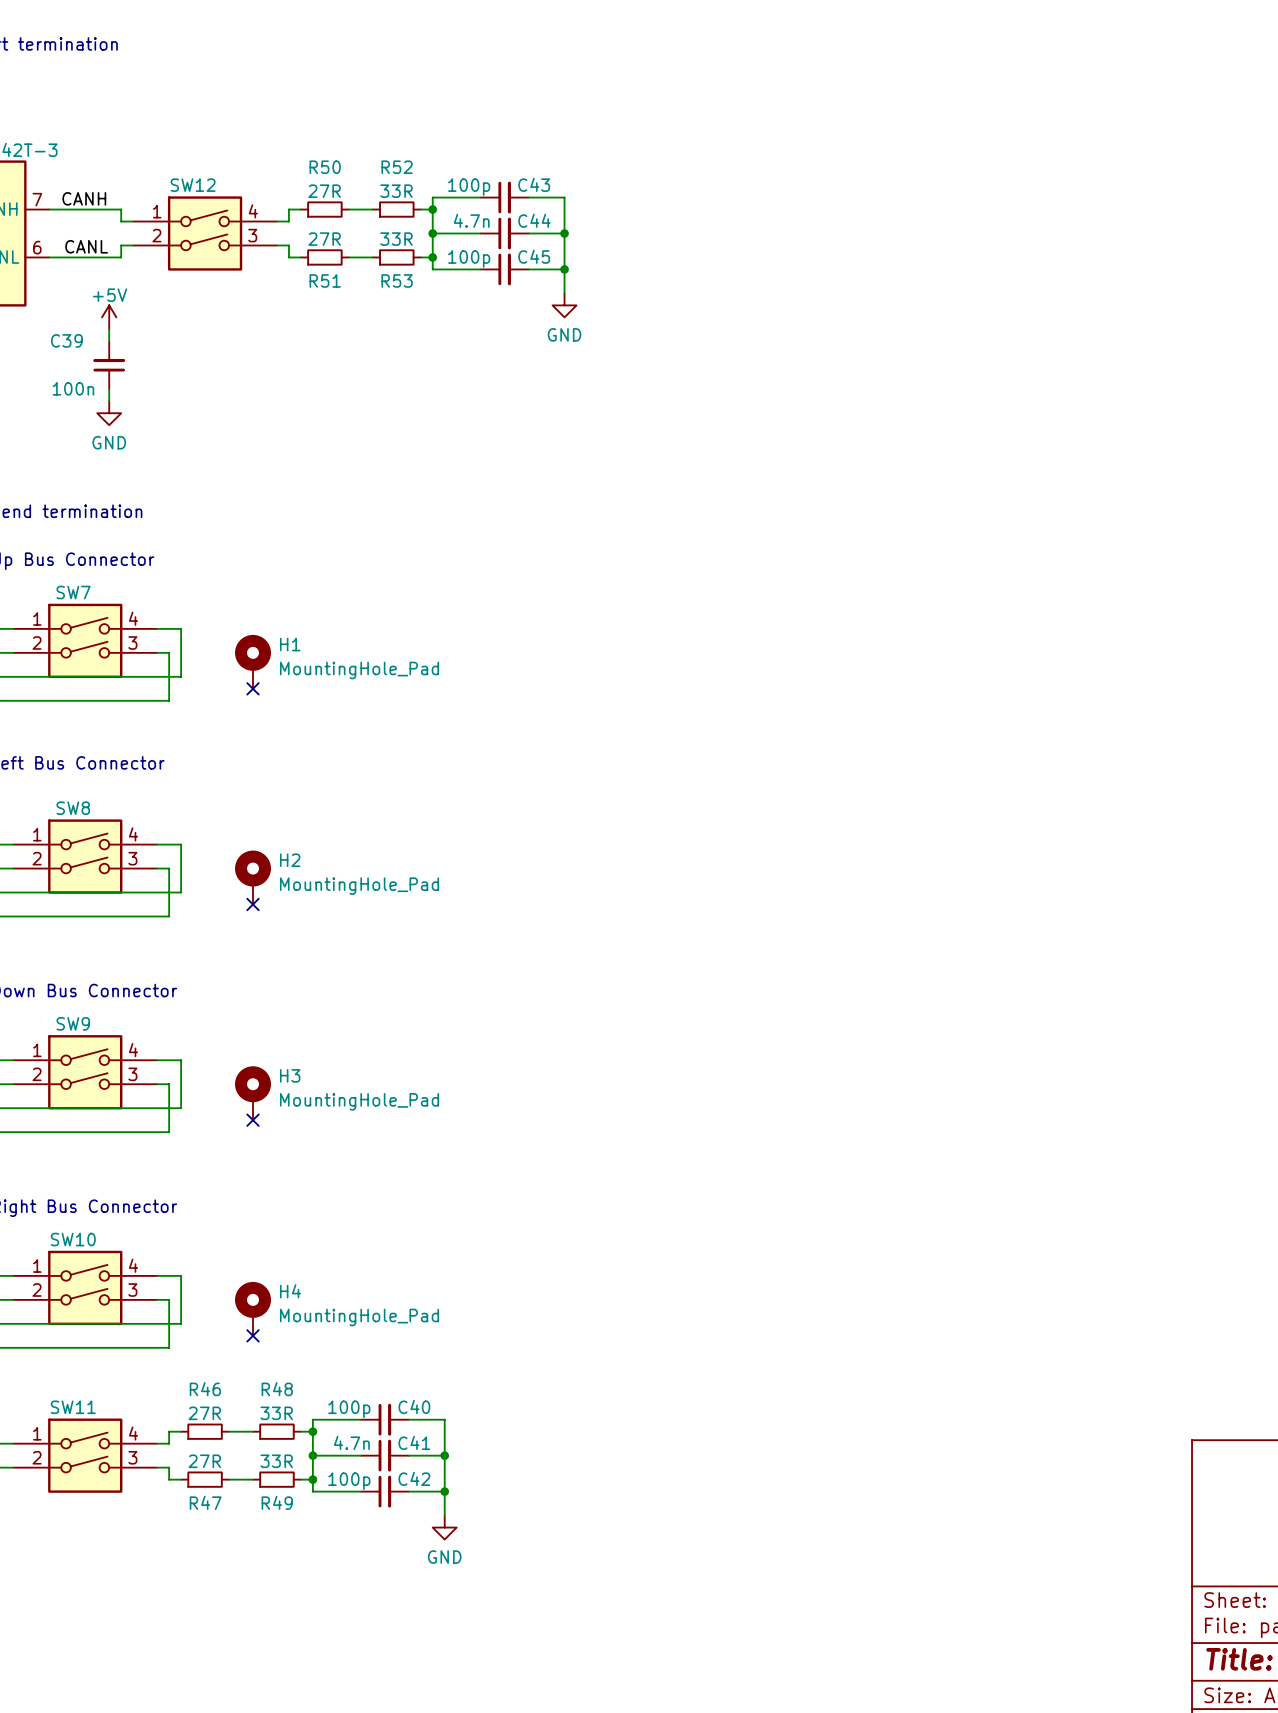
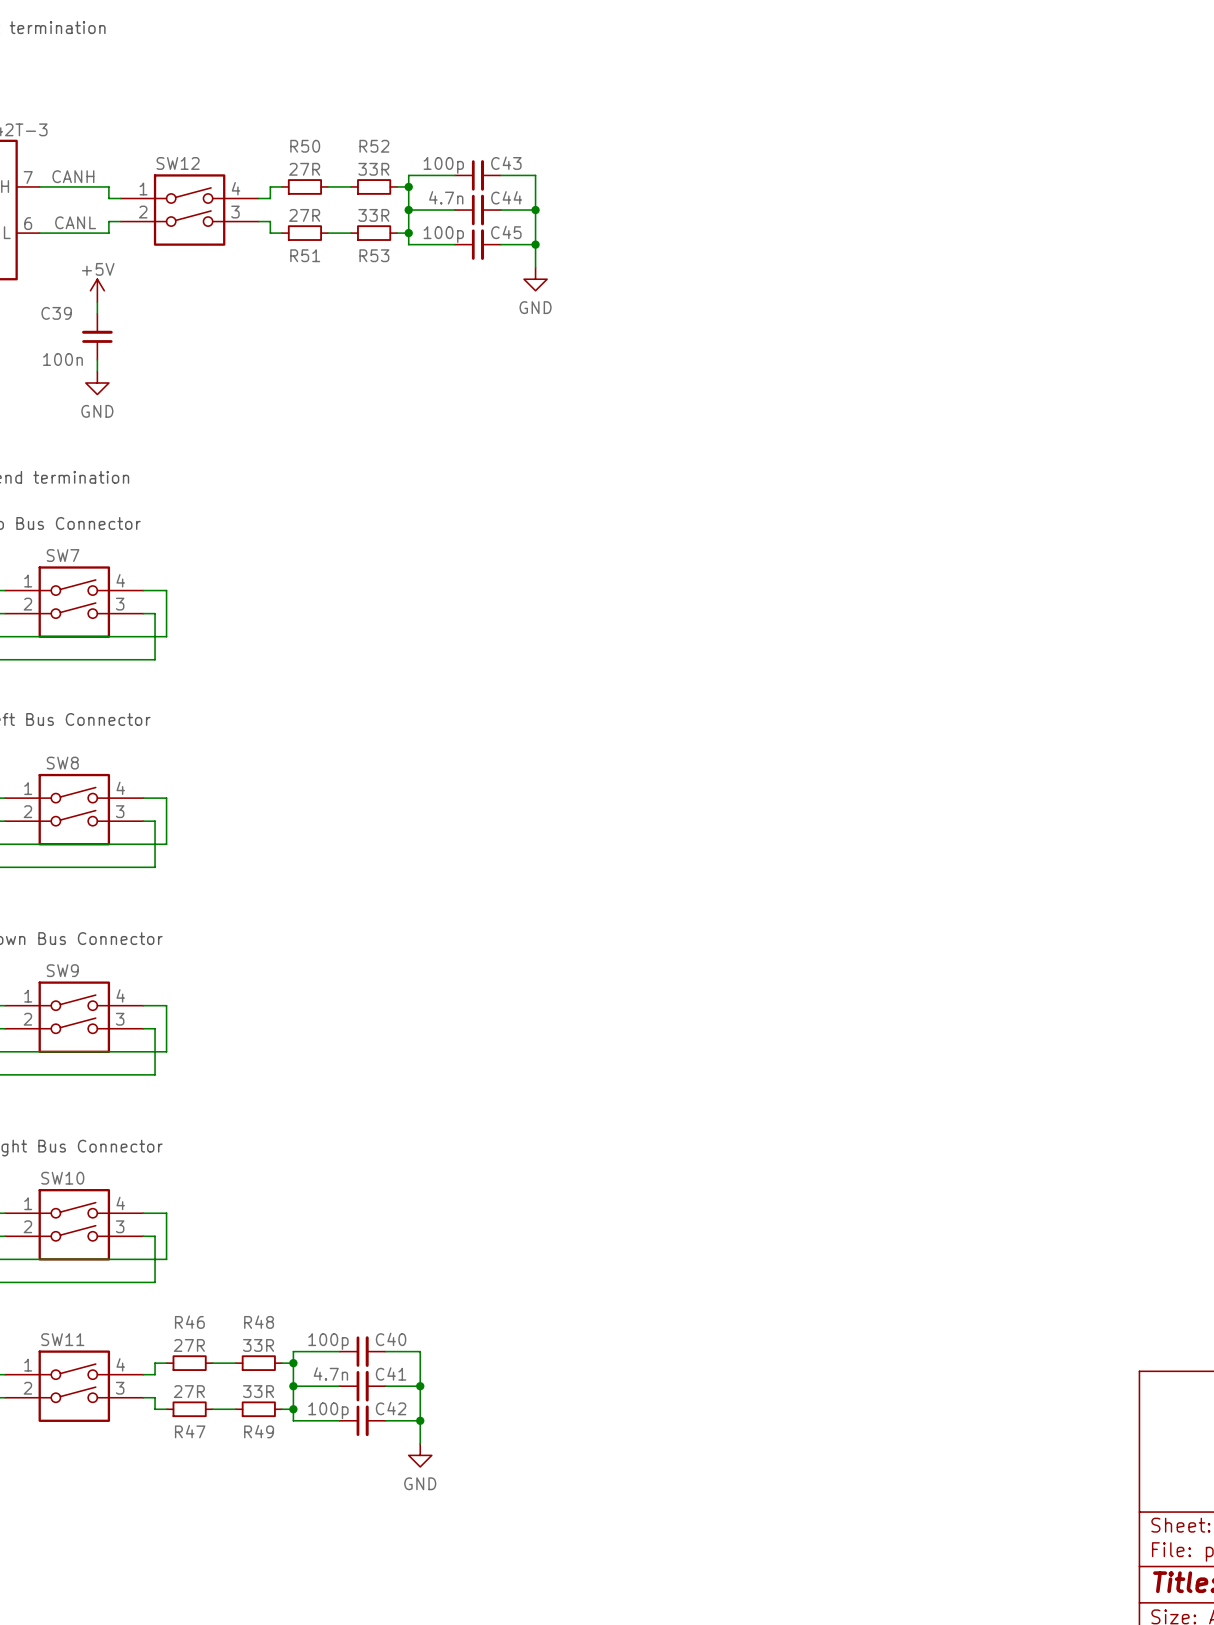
H1: MountingHole_Pad (253, 661) -> none
no-connect mark: (253, 688) -> none
H2: MountingHole_Pad (253, 877) -> none
no-connect mark: (253, 904) -> none
H3: MountingHole_Pad (253, 1093) -> none
no-connect mark: (253, 1120) -> none
H4: MountingHole_Pad (253, 1308) -> none
no-connect mark: (253, 1335) -> none

